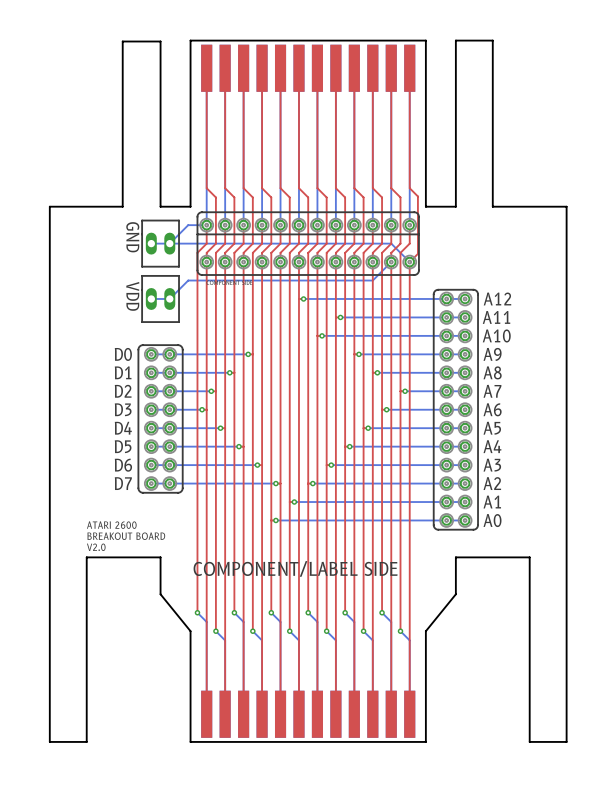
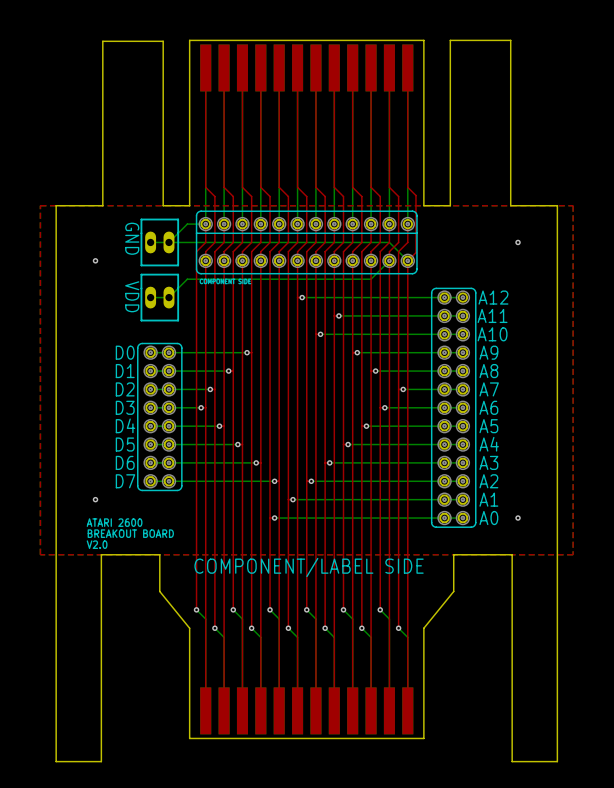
top zone outline: none -> (40, 205) (40, 554) (573, 554) (573, 205) (40, 205)
via: none -> (518, 242)
via: none -> (95, 260)
part: (308, 391) -> none
part: none -> (306, 401)
via: none -> (95, 499)
via: none -> (518, 518)

